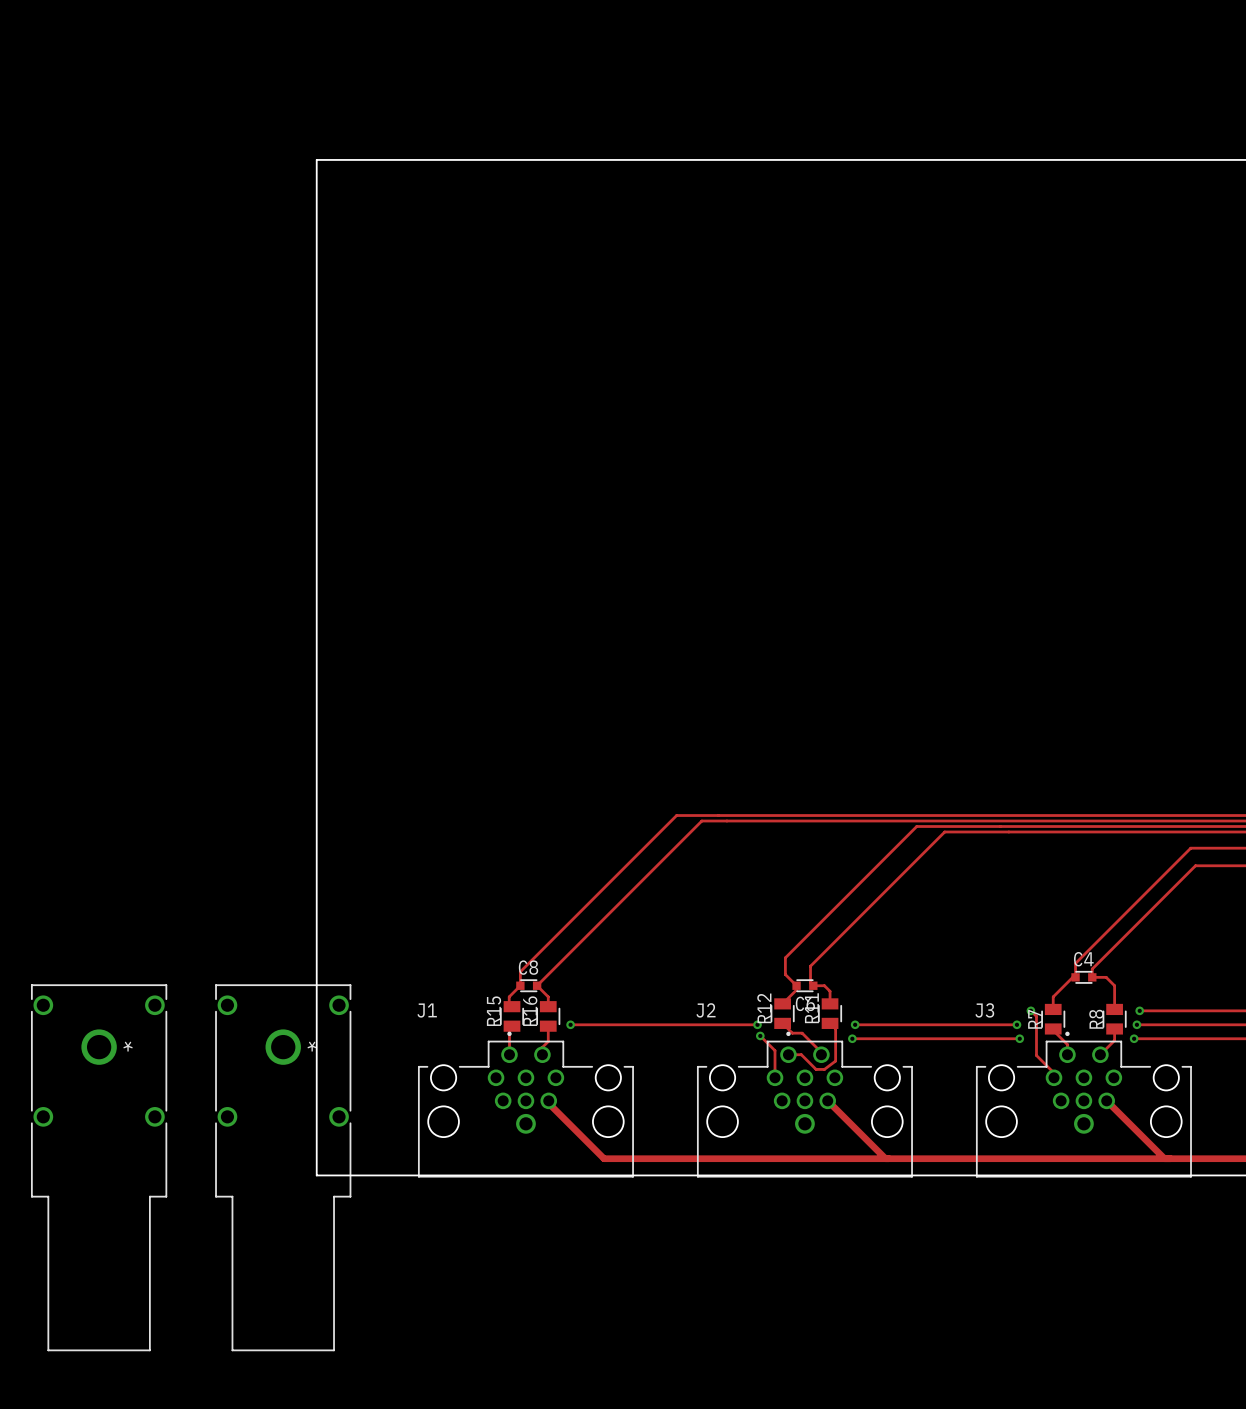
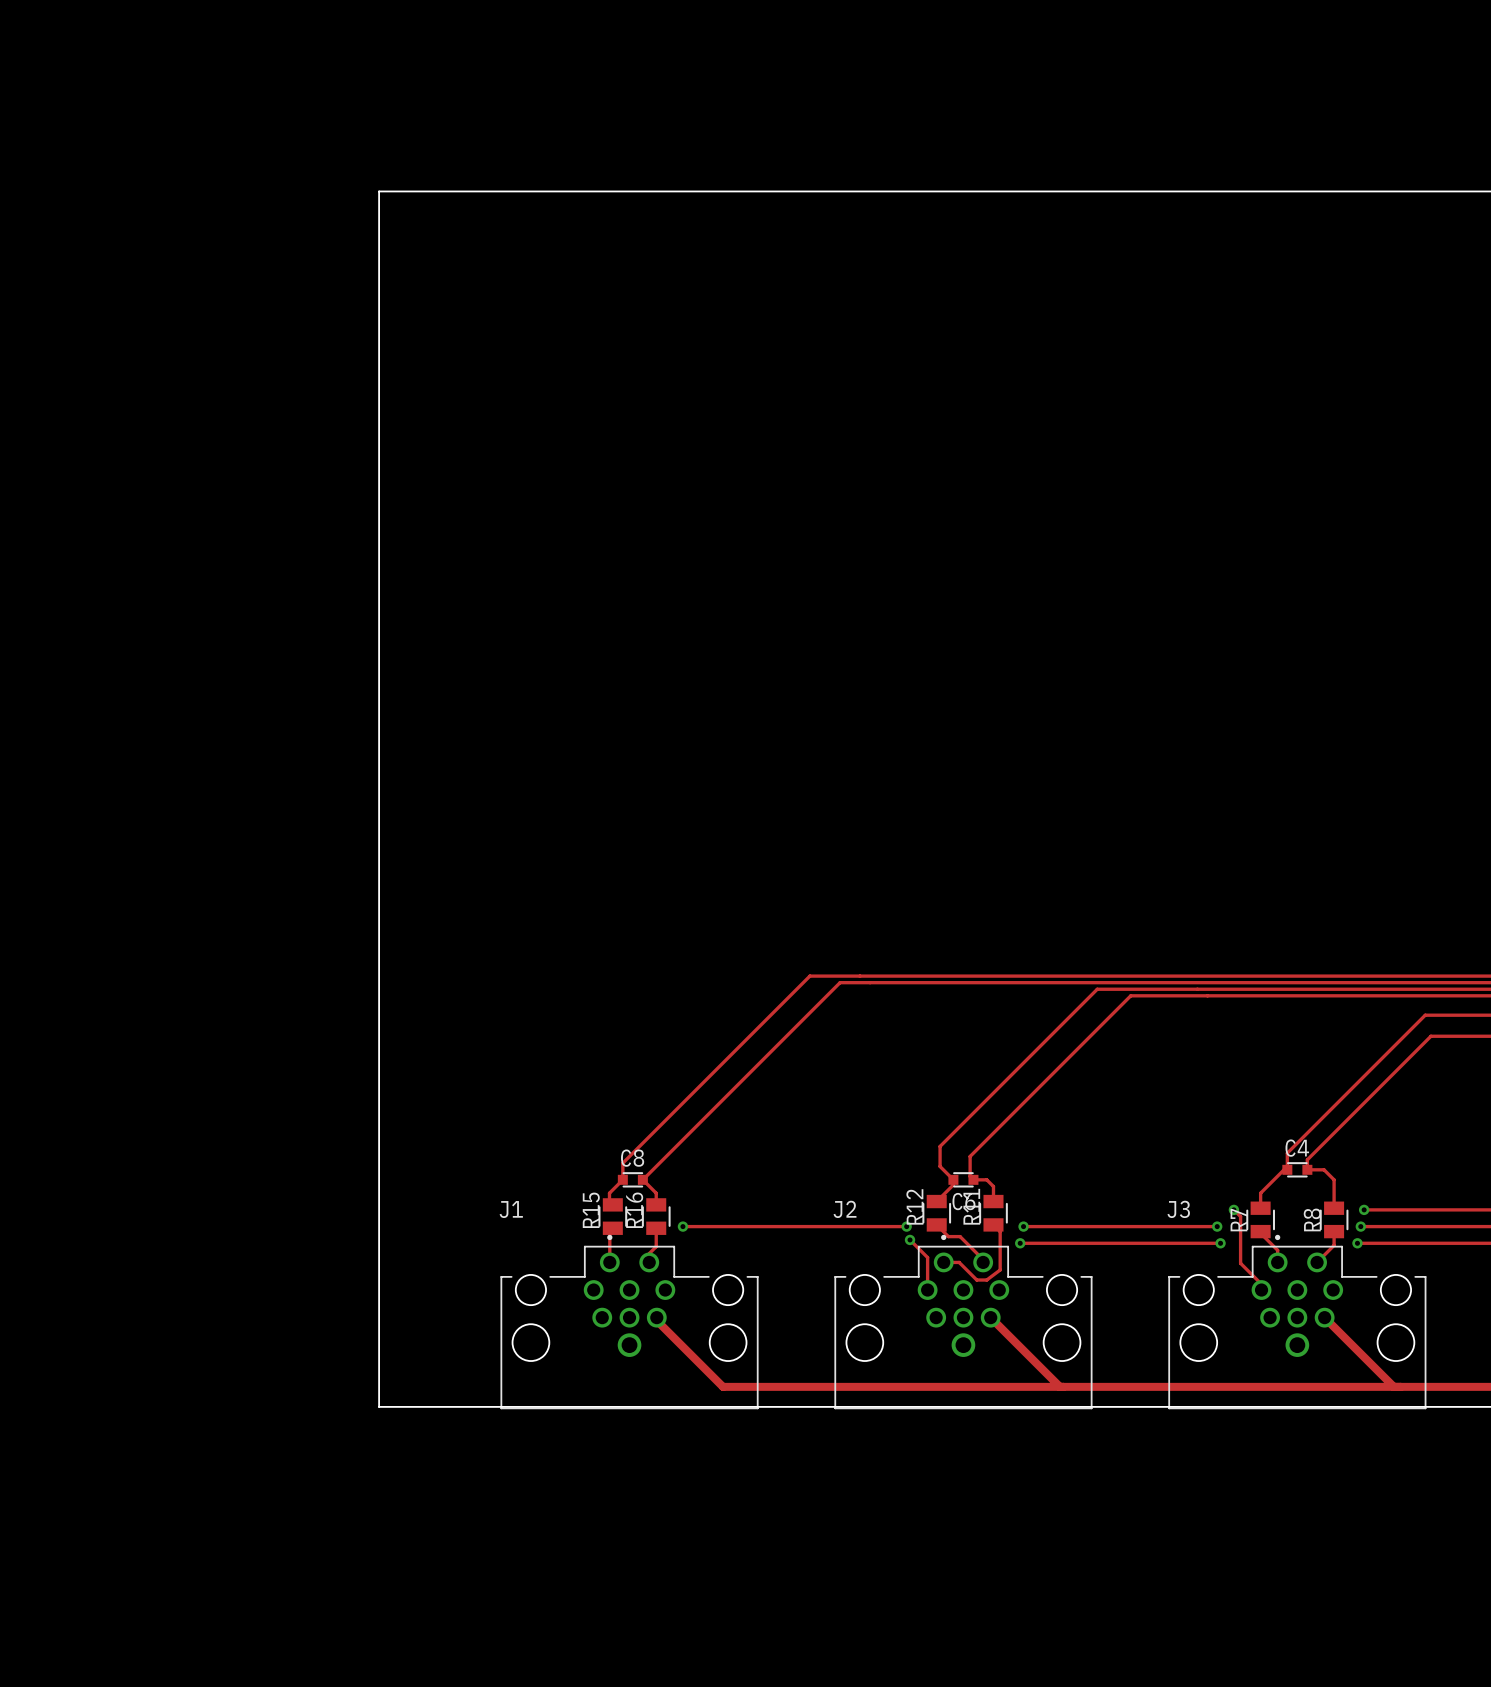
part: (99, 1167) -> none
part: (283, 1167) -> none

